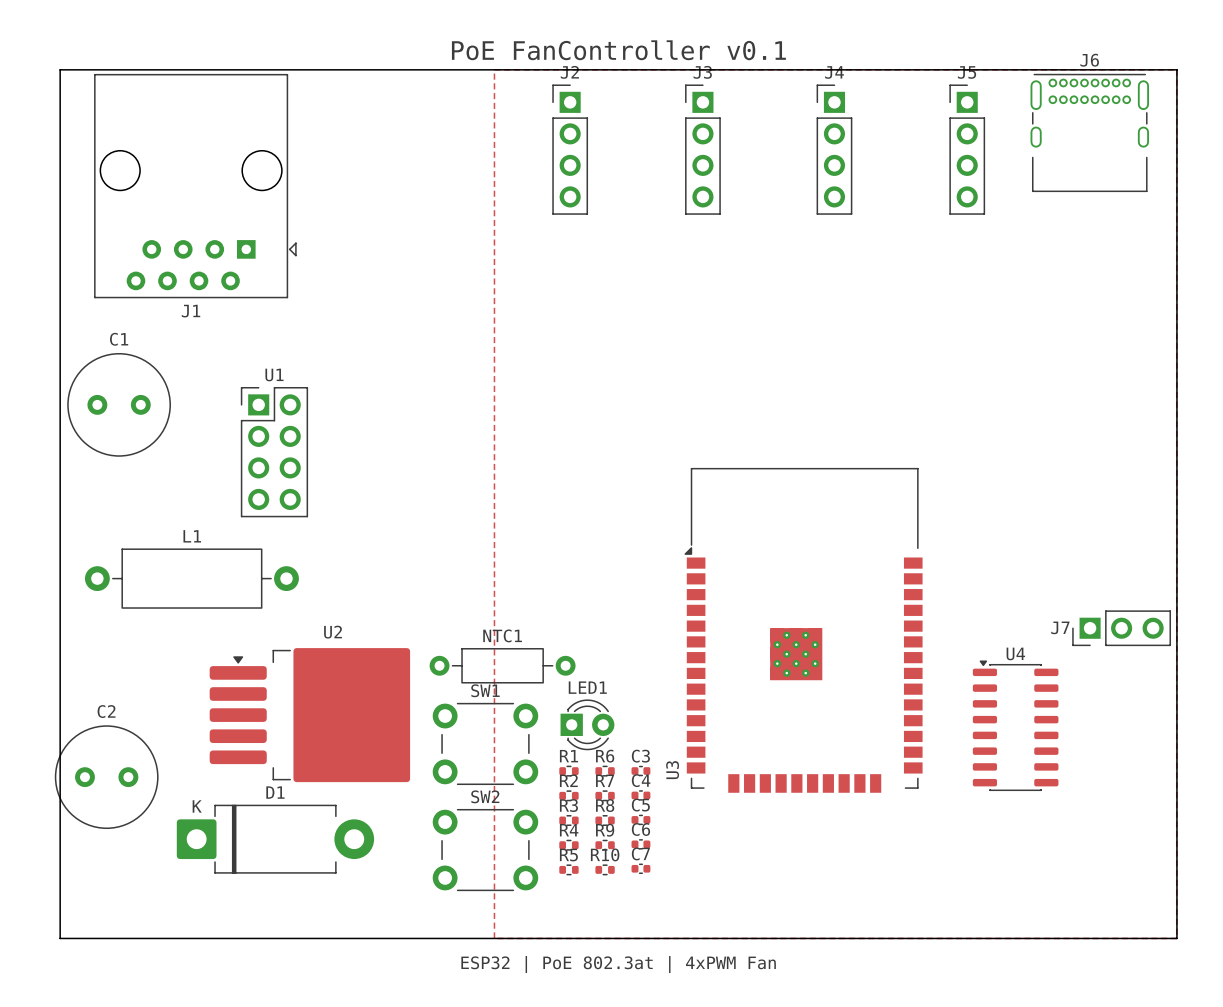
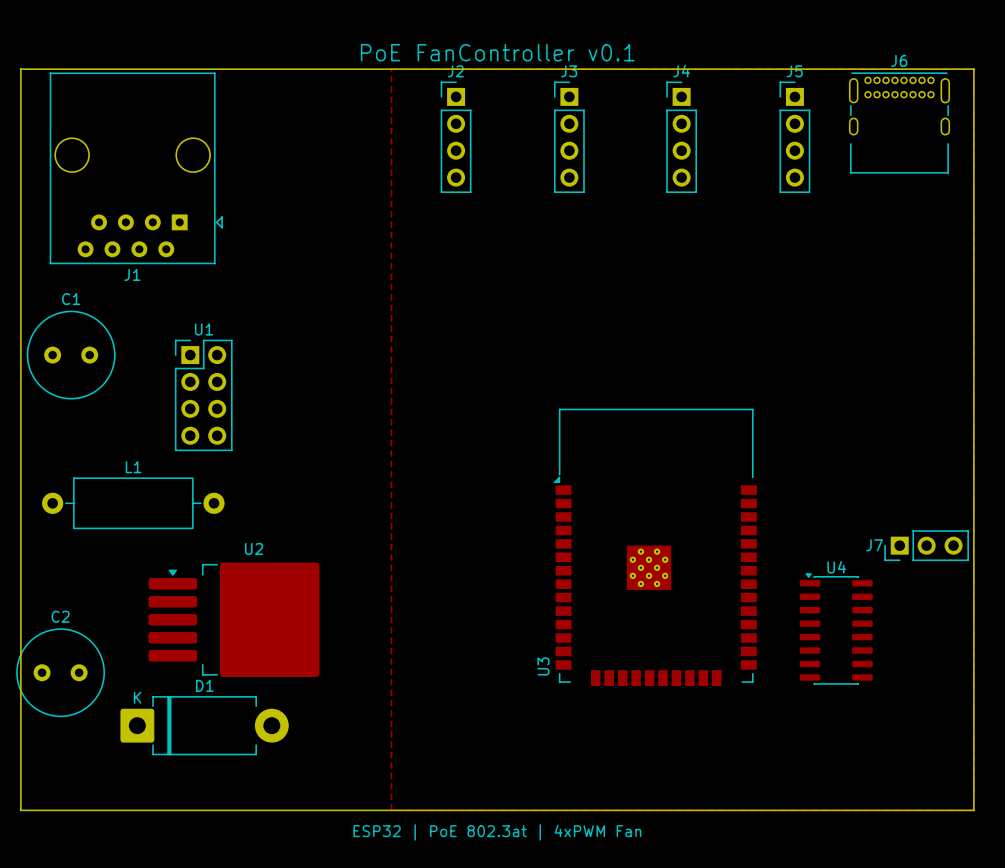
NTC1: (502, 665) -> none
LED1: (587, 724) -> none
SW1: (485, 743) -> none
R1: (568, 771) -> none
R6: (605, 771) -> none
C3: (640, 771) -> none
R2: (568, 795) -> none
R7: (605, 795) -> none
C4: (640, 795) -> none
C5: (640, 819) -> none
R3: (568, 820) -> none
R8: (605, 820) -> none
C6: (640, 844) -> none
R4: (568, 845) -> none
R9: (605, 845) -> none
SW2: (485, 850) -> none
C7: (640, 868) -> none
R5: (568, 869) -> none
R10: (605, 869) -> none

